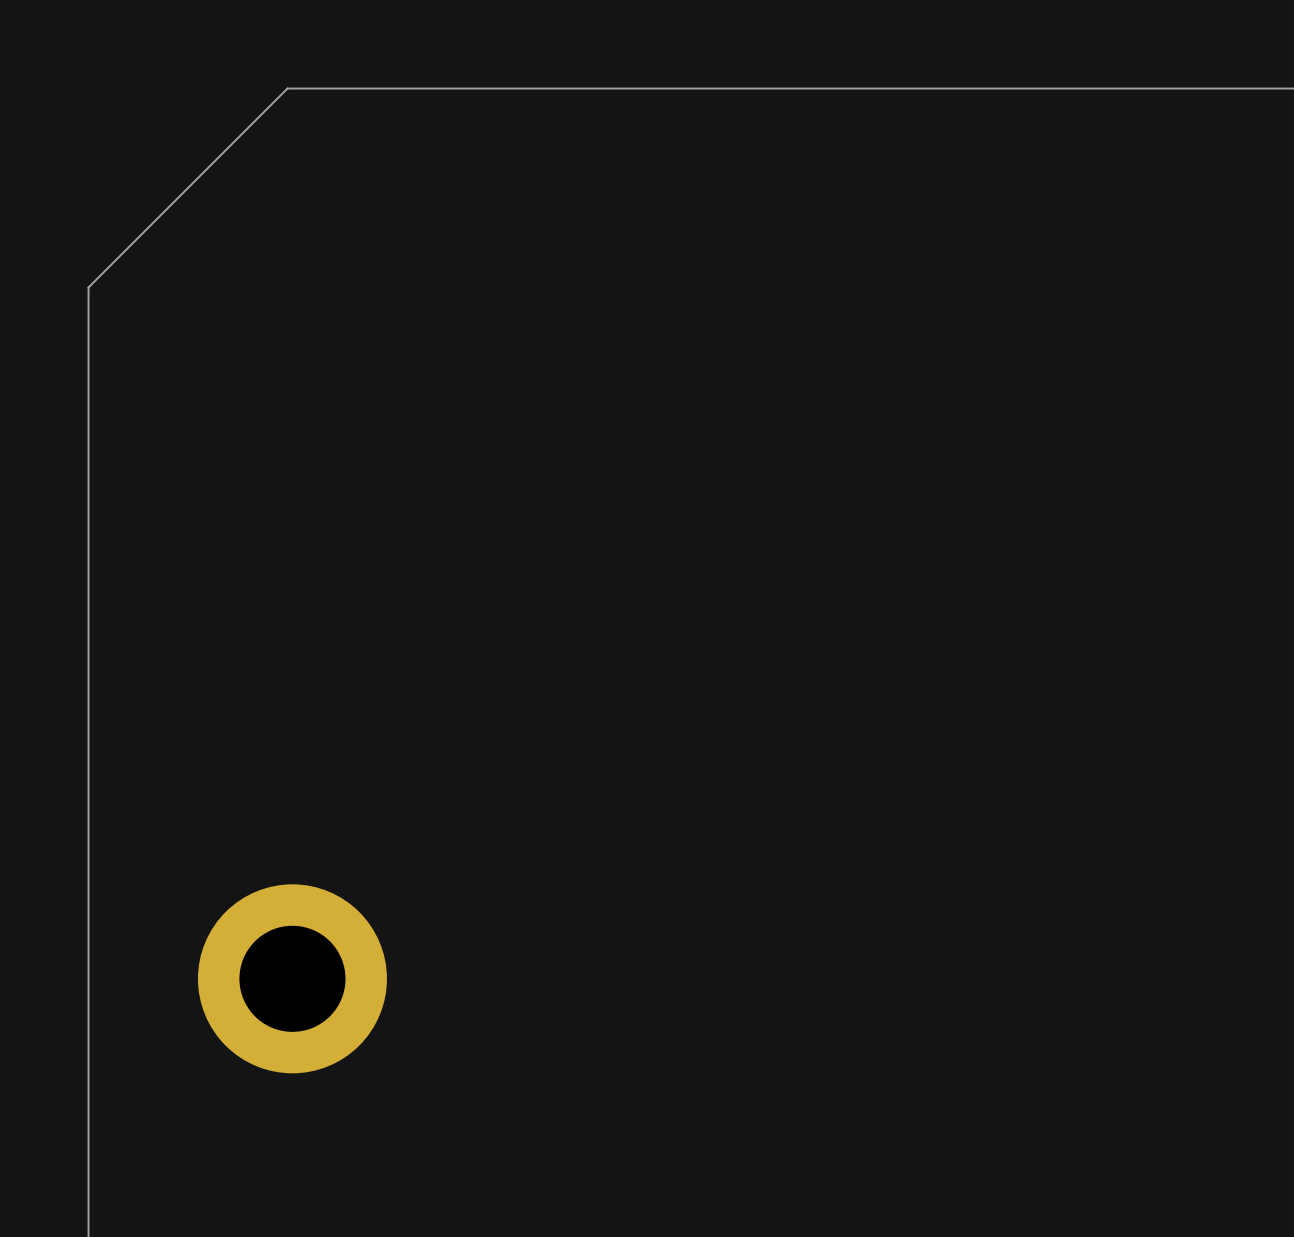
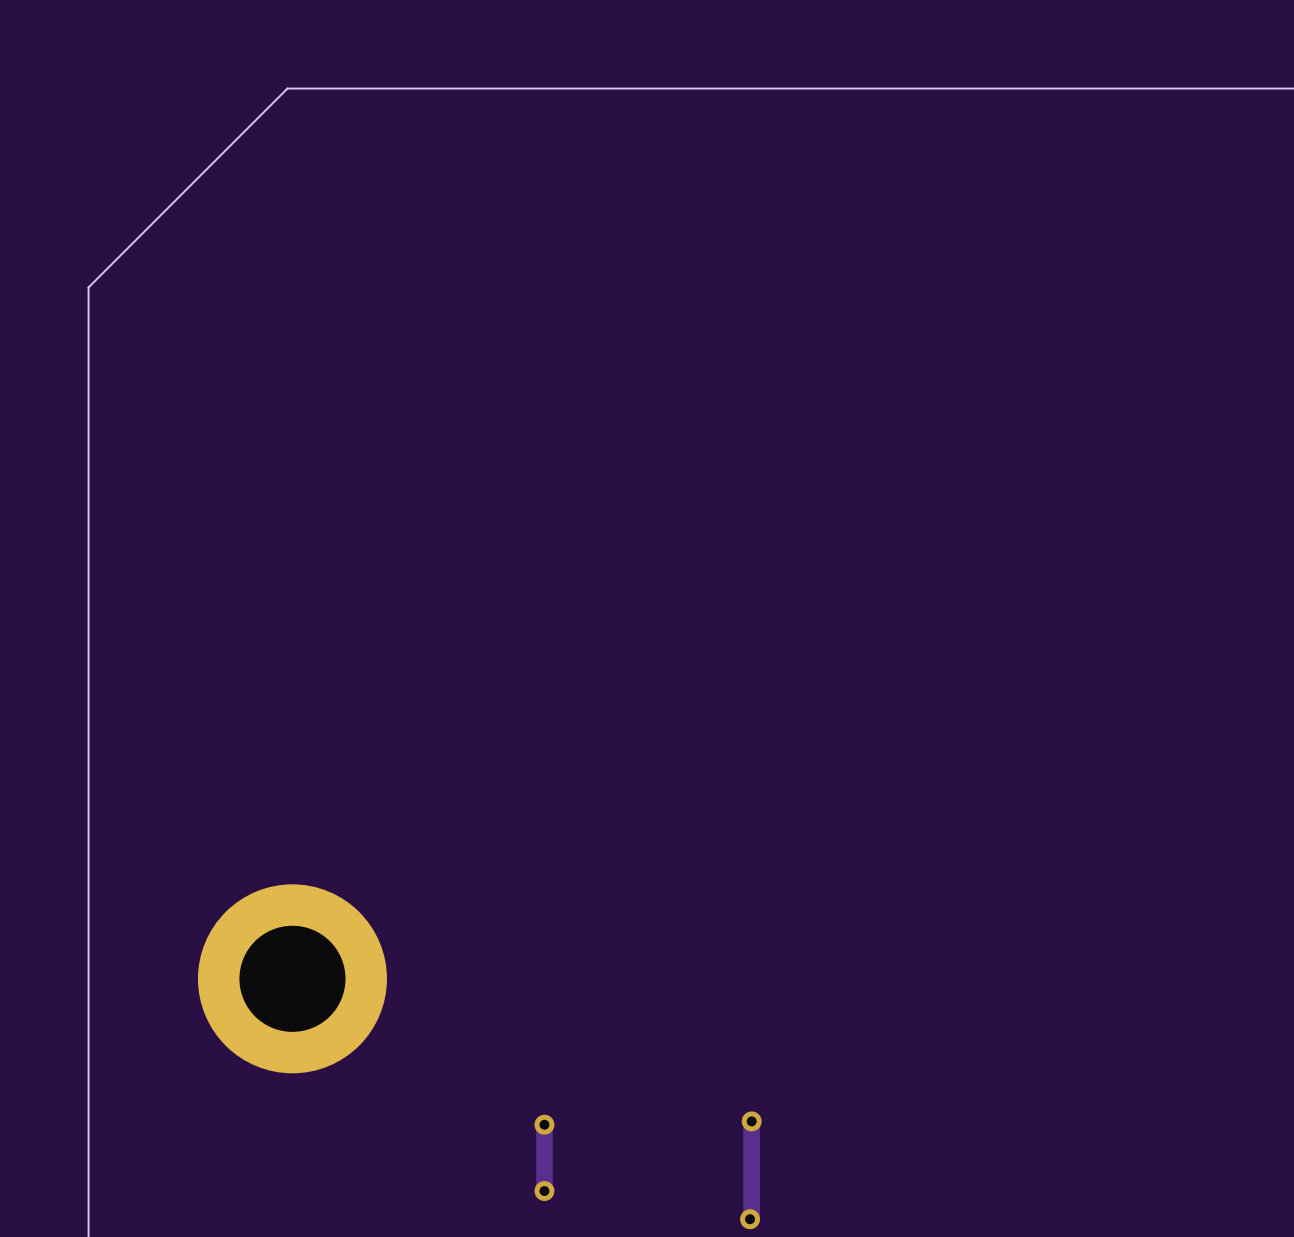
track: none -> (751, 1121) (751, 1217) (750, 1219)
via: none -> (751, 1121)
track: none -> (544, 1124) (544, 1191)
via: none -> (544, 1124)
via: none -> (544, 1191)
via: none -> (750, 1219)

